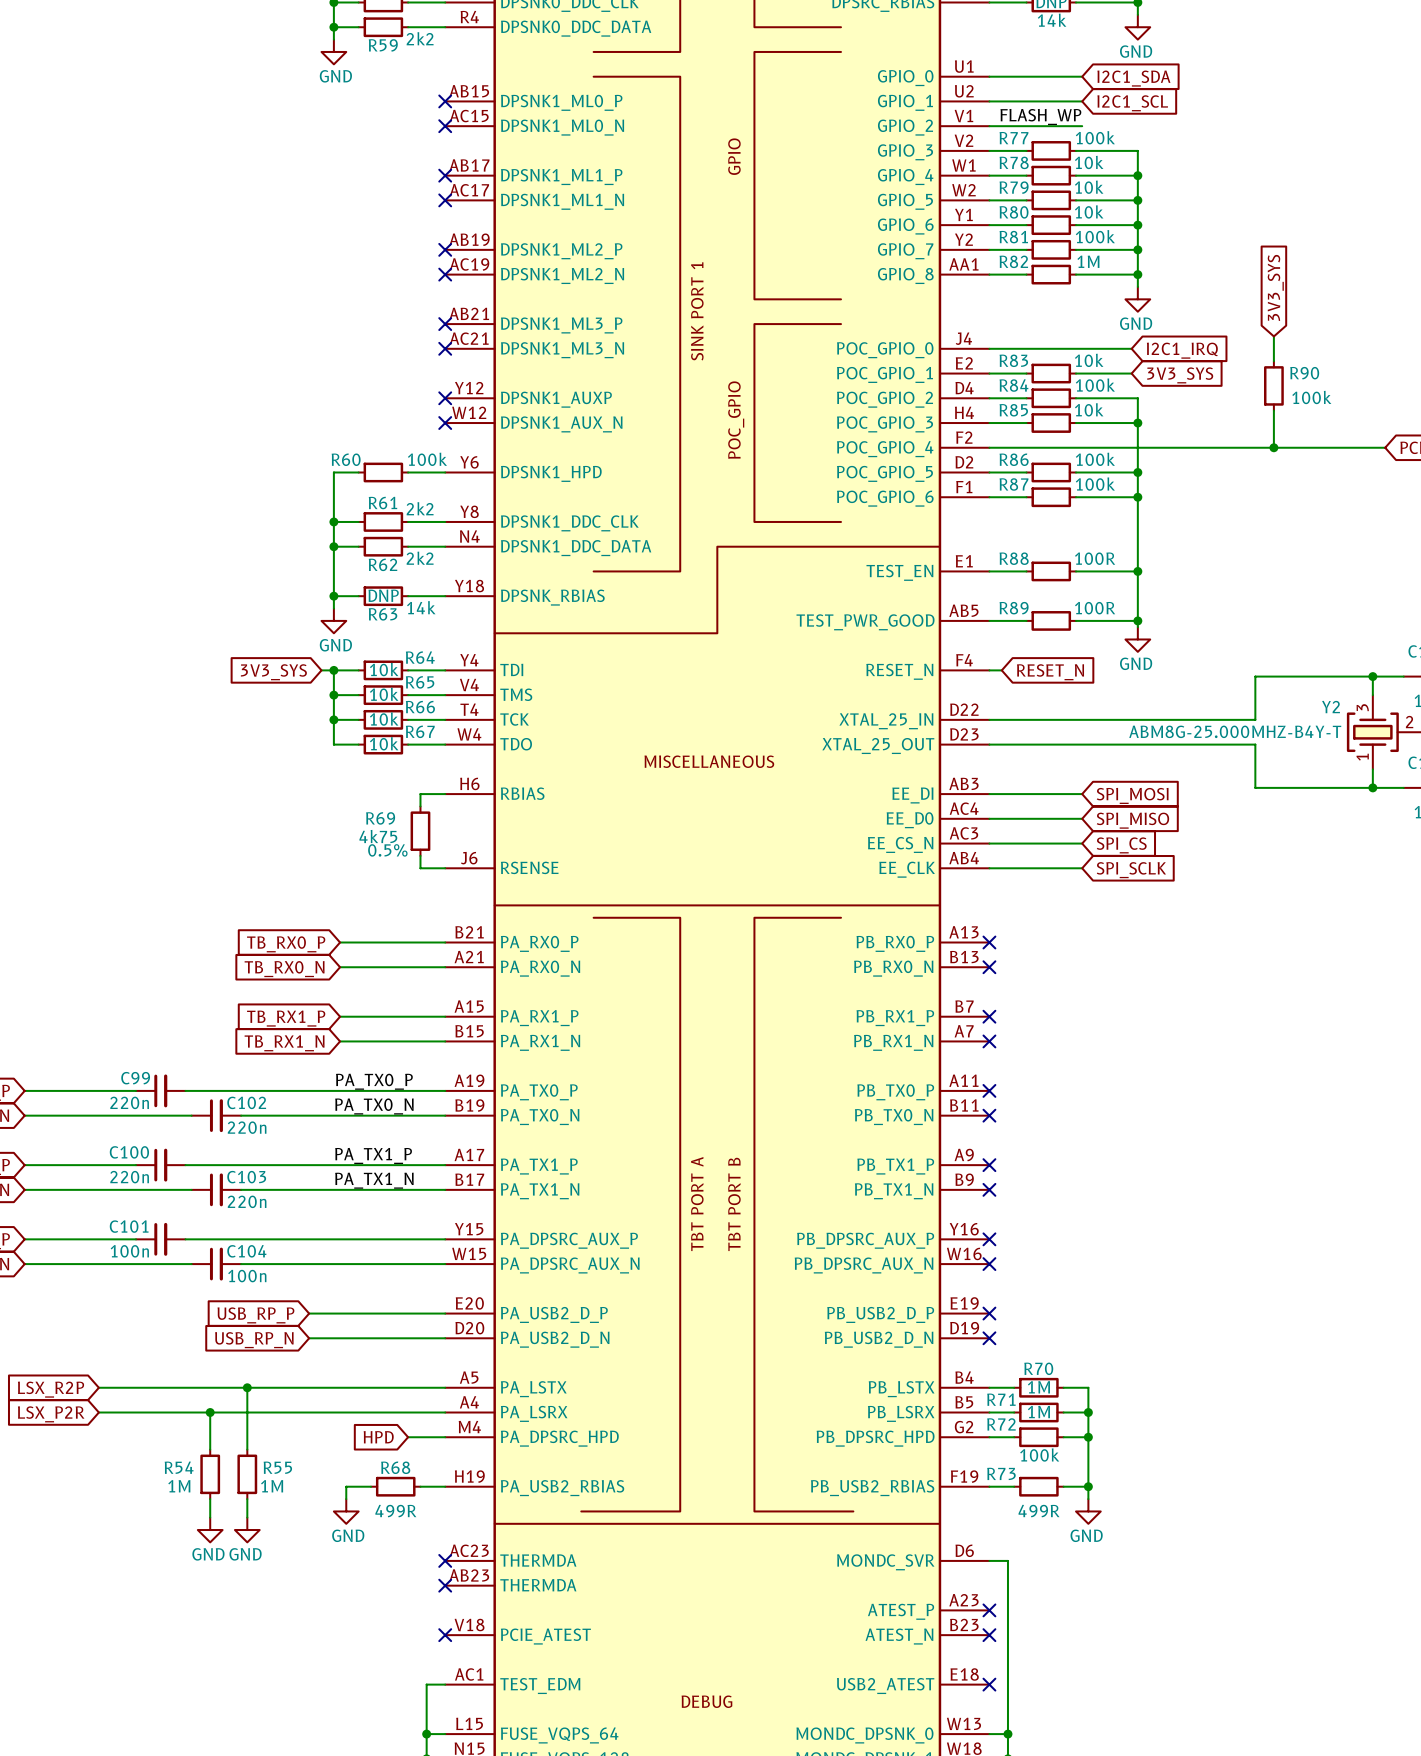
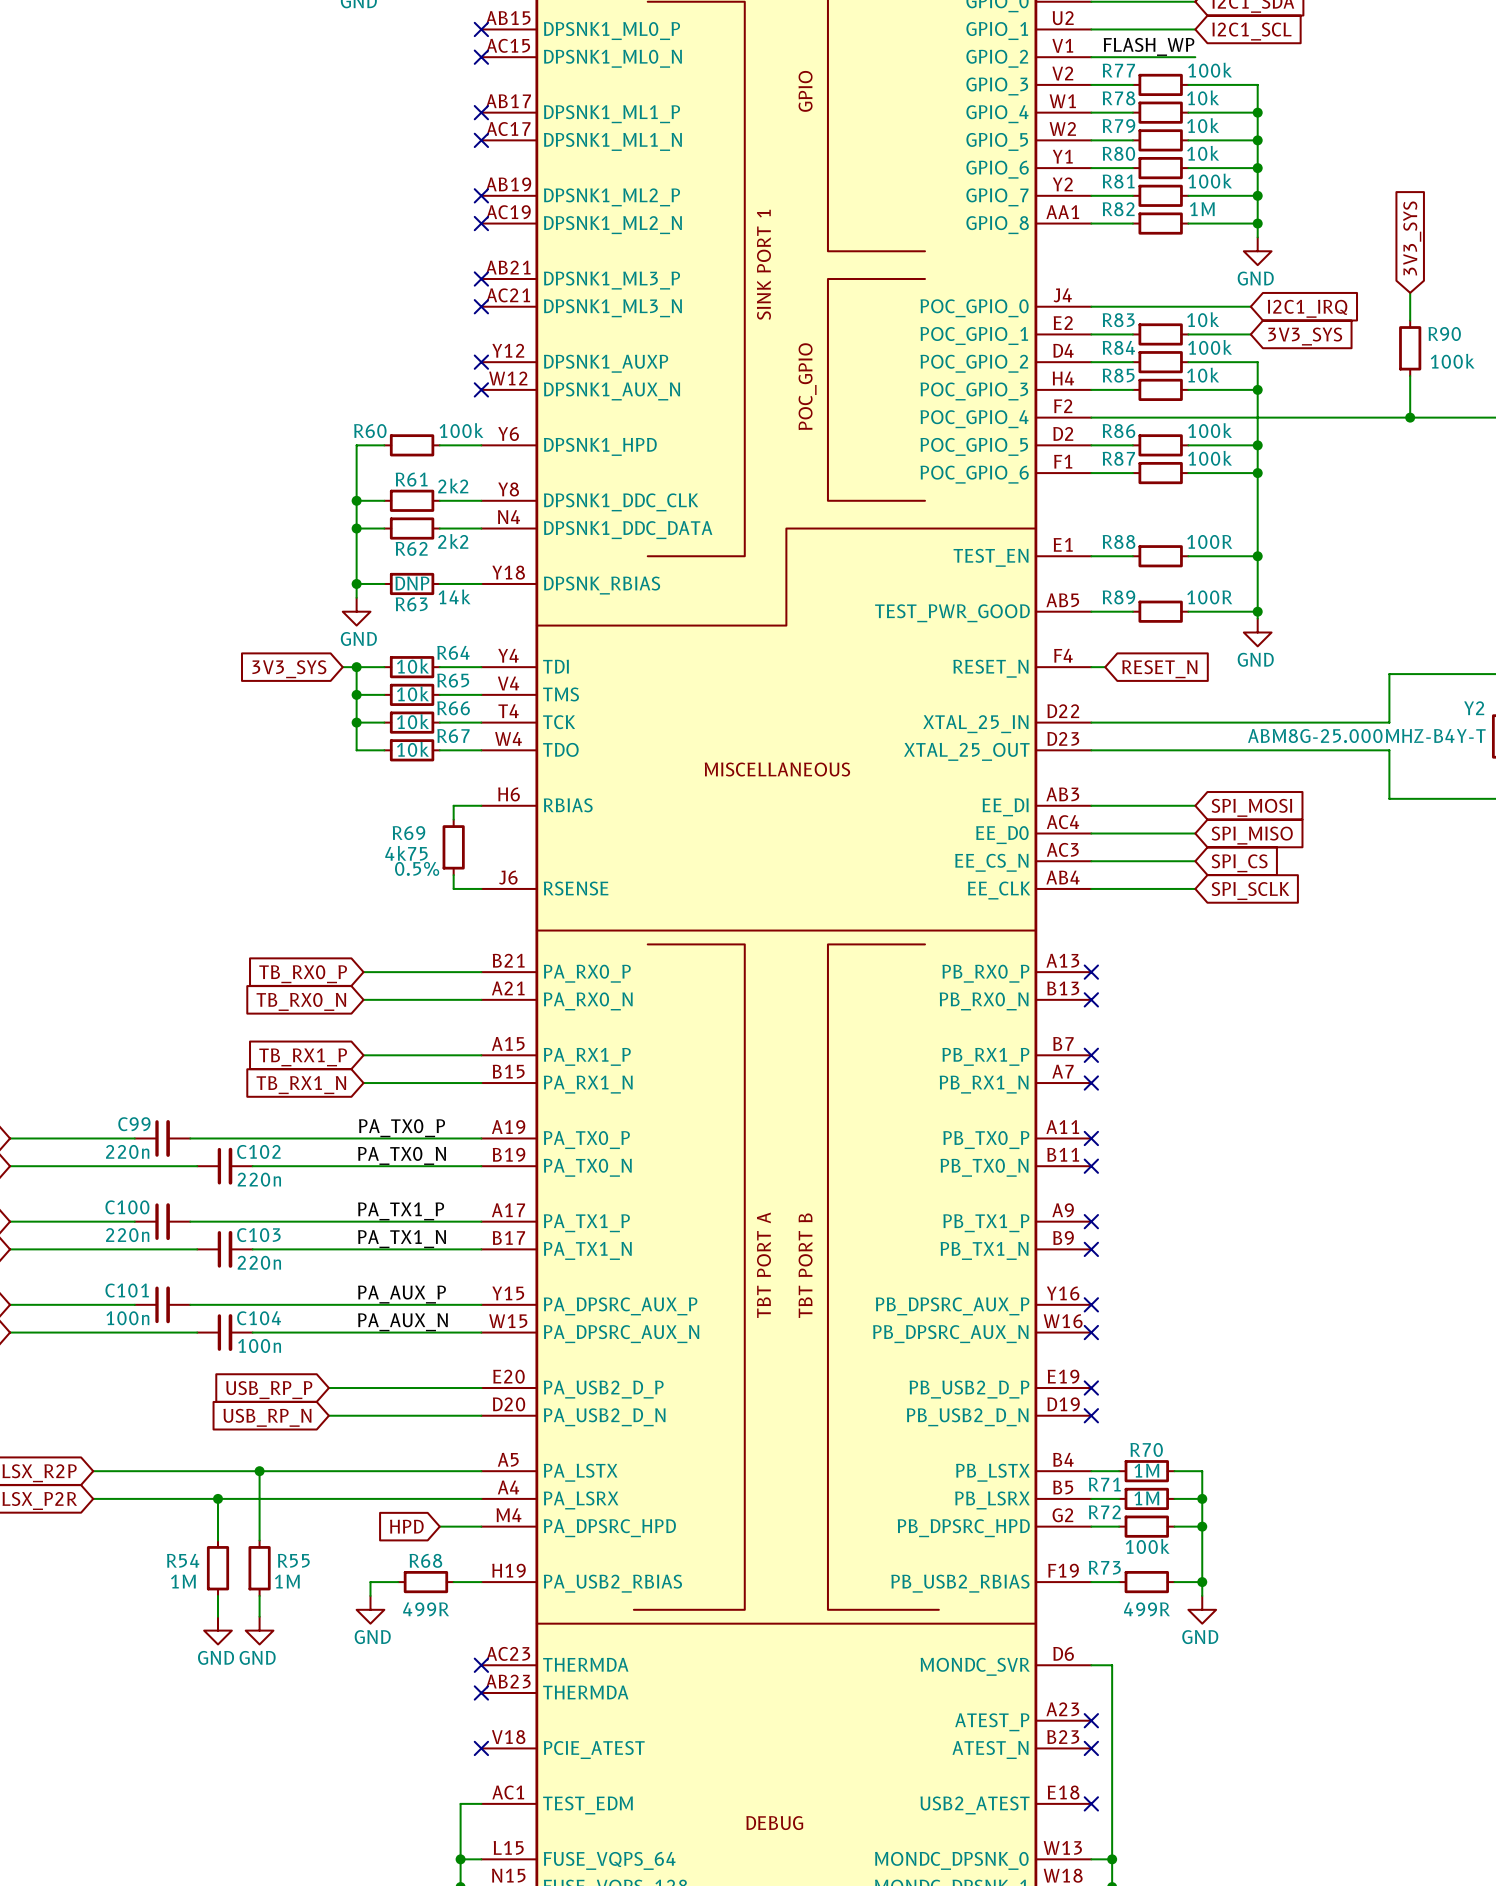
label: none -> PA_AUX_P (401, 1294)
label: none -> PA_AUX_N (402, 1322)

